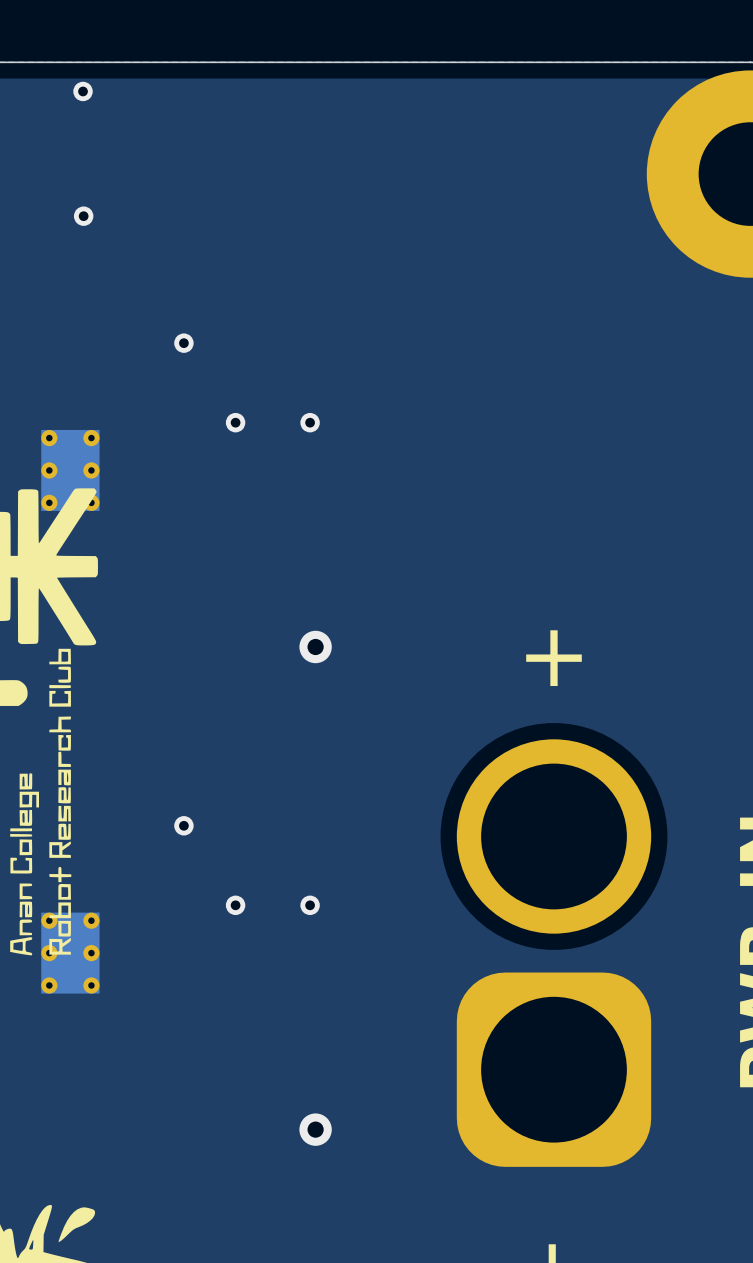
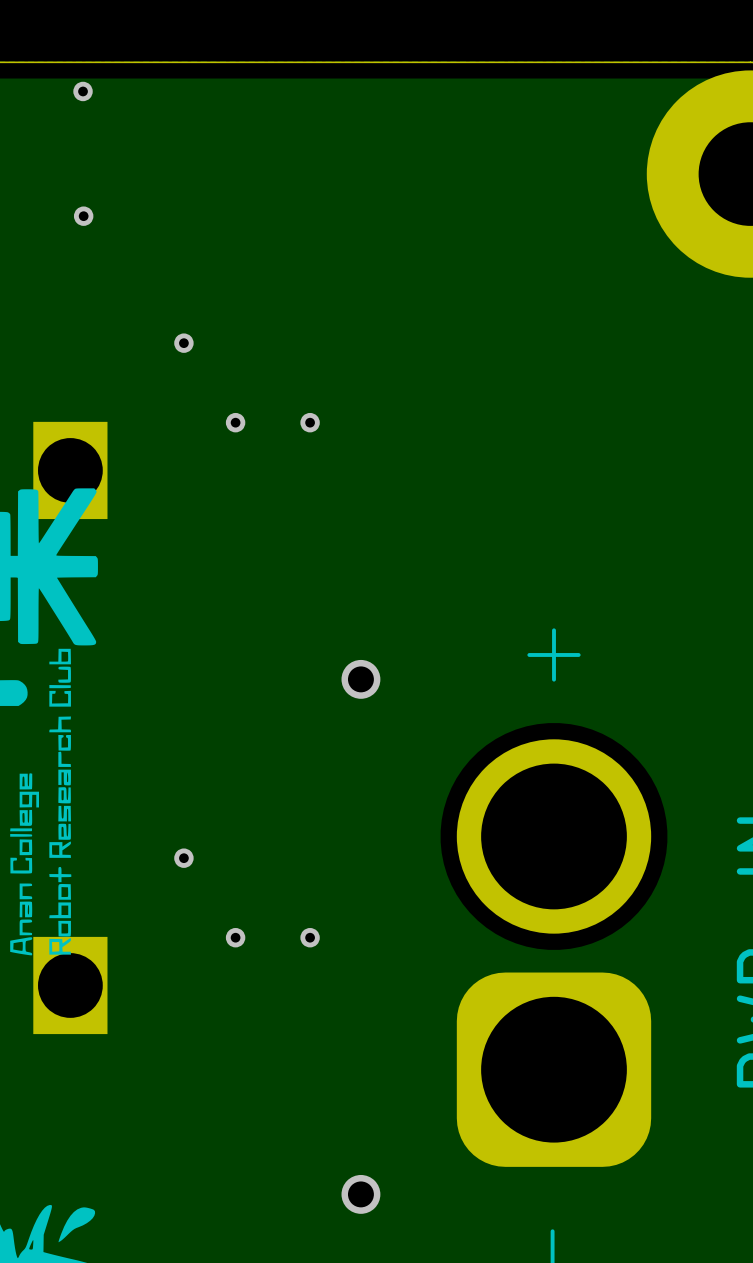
part footprint: [41, 429, 100, 511] -> [33, 421, 108, 520]
via: (315, 646) -> none
via: none -> (360, 679)
via position: (183, 825) -> (183, 858)
via position: (235, 905) -> (235, 937)
via position: (310, 905) -> (310, 937)
part footprint: [41, 912, 100, 994] -> [33, 936, 108, 1035]
via: (315, 1129) -> none
via: none -> (360, 1194)

